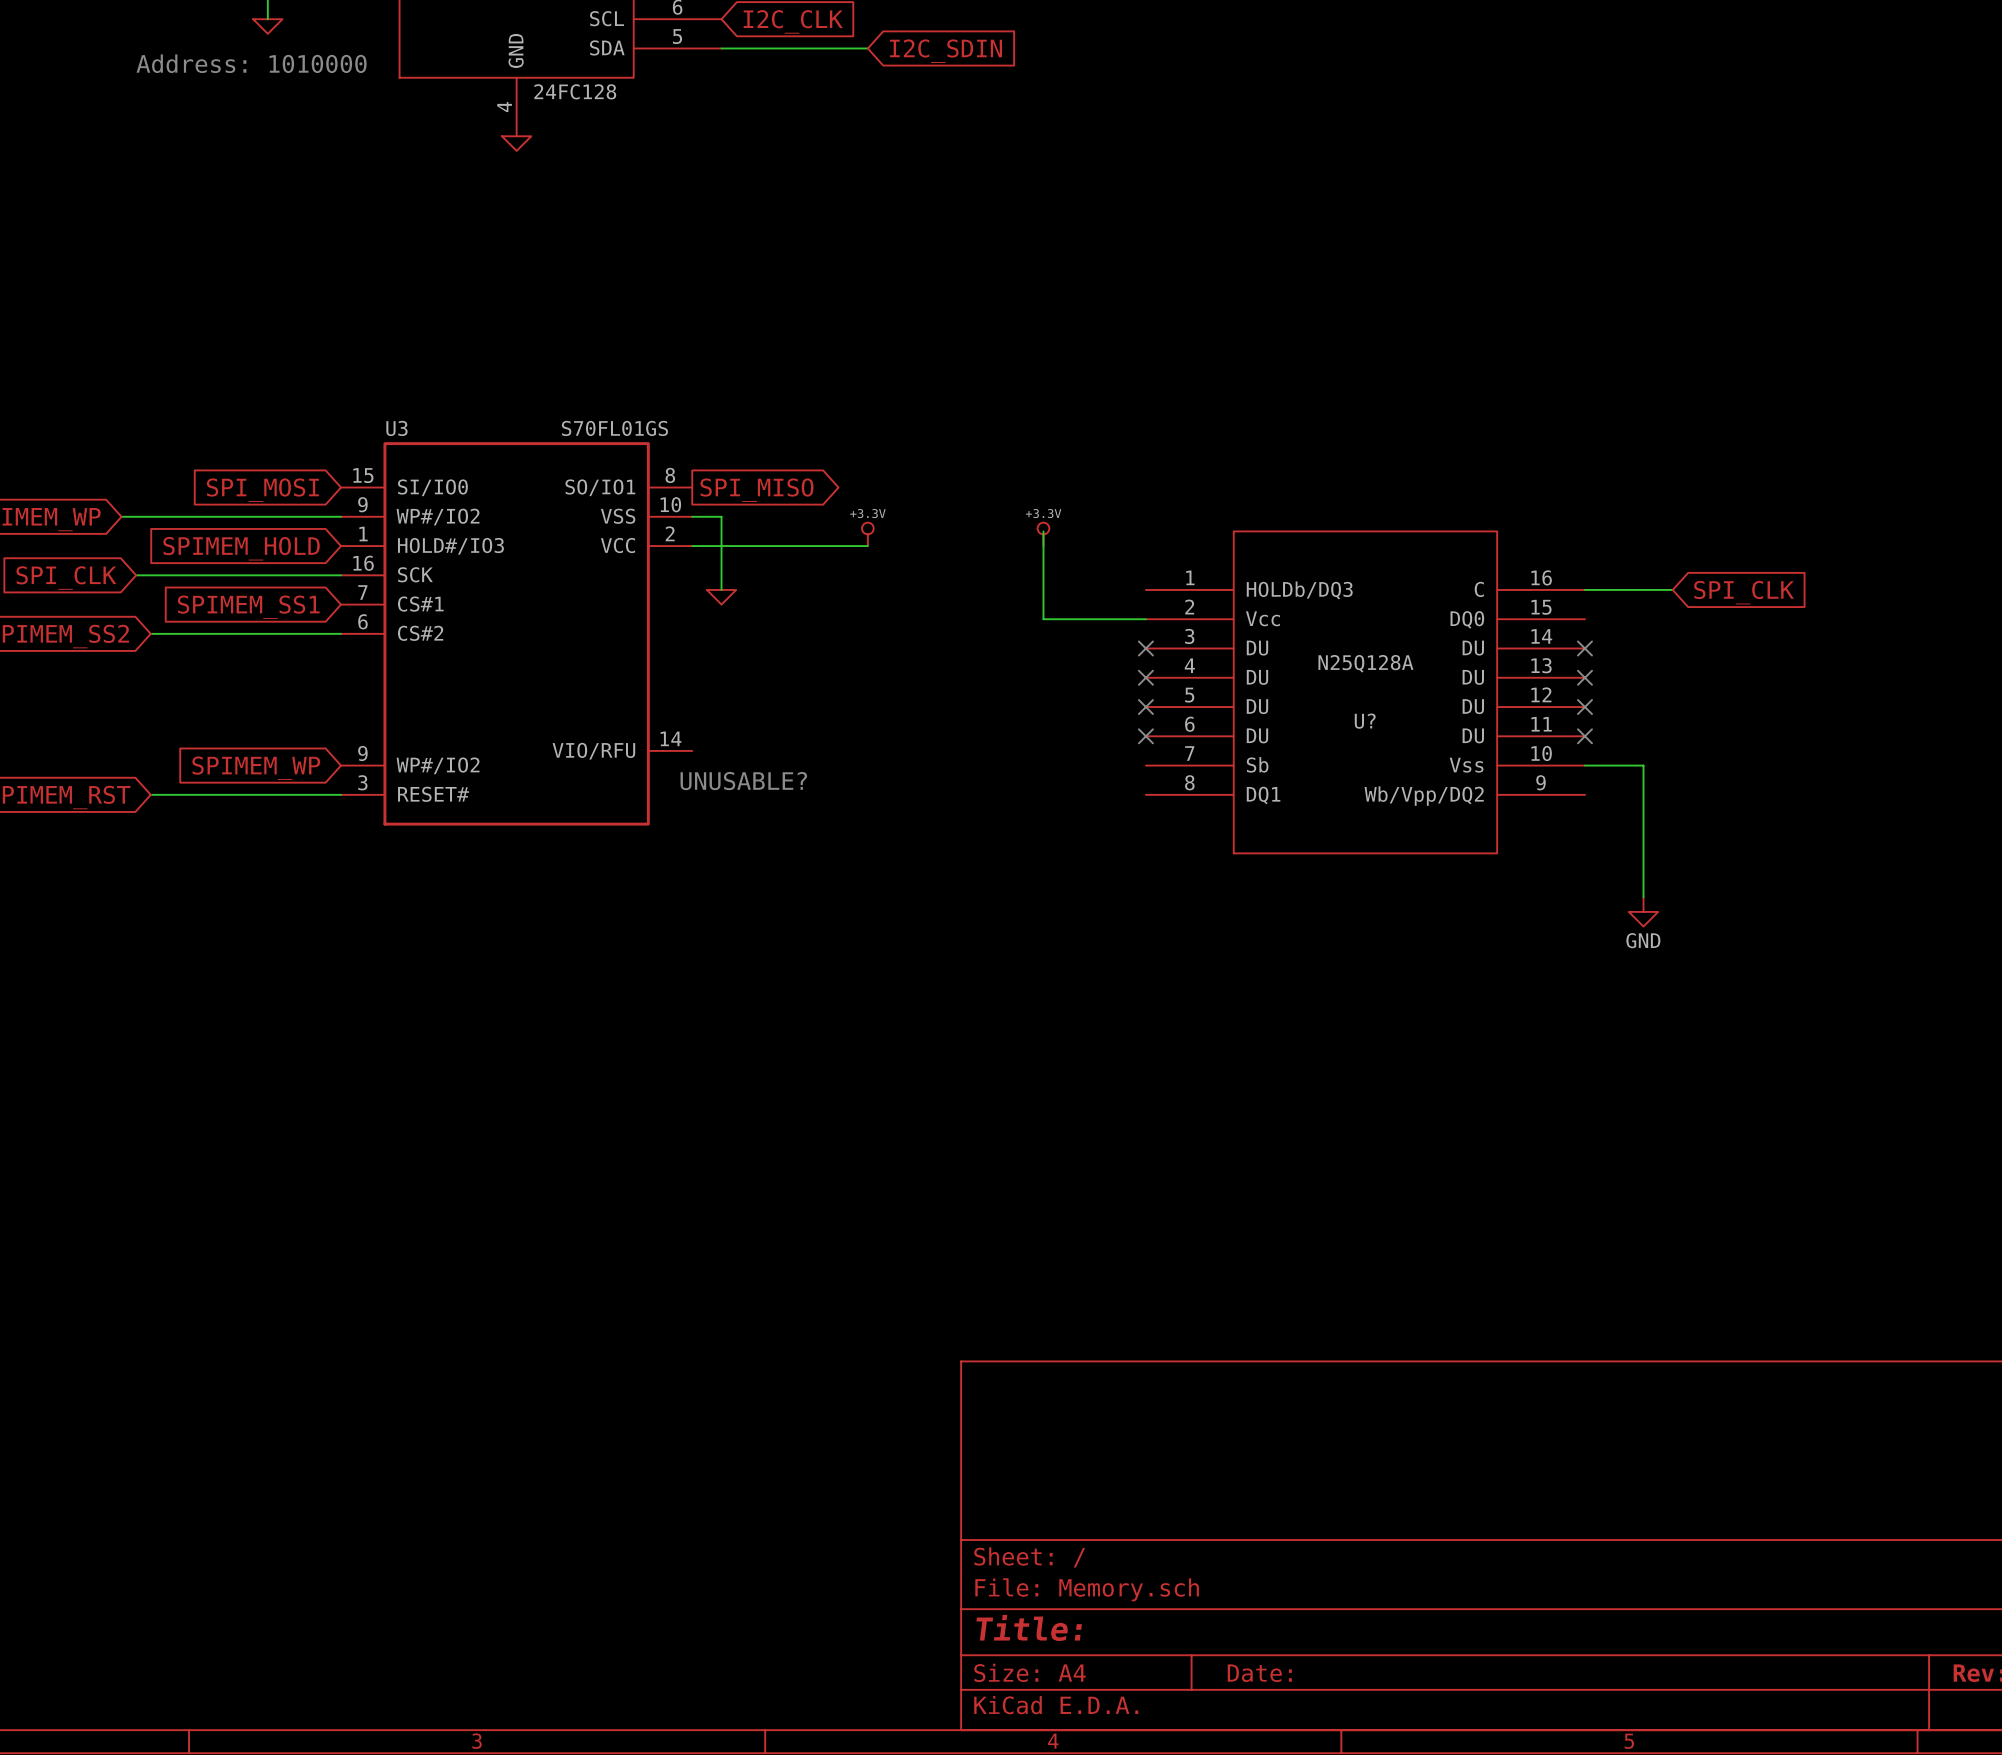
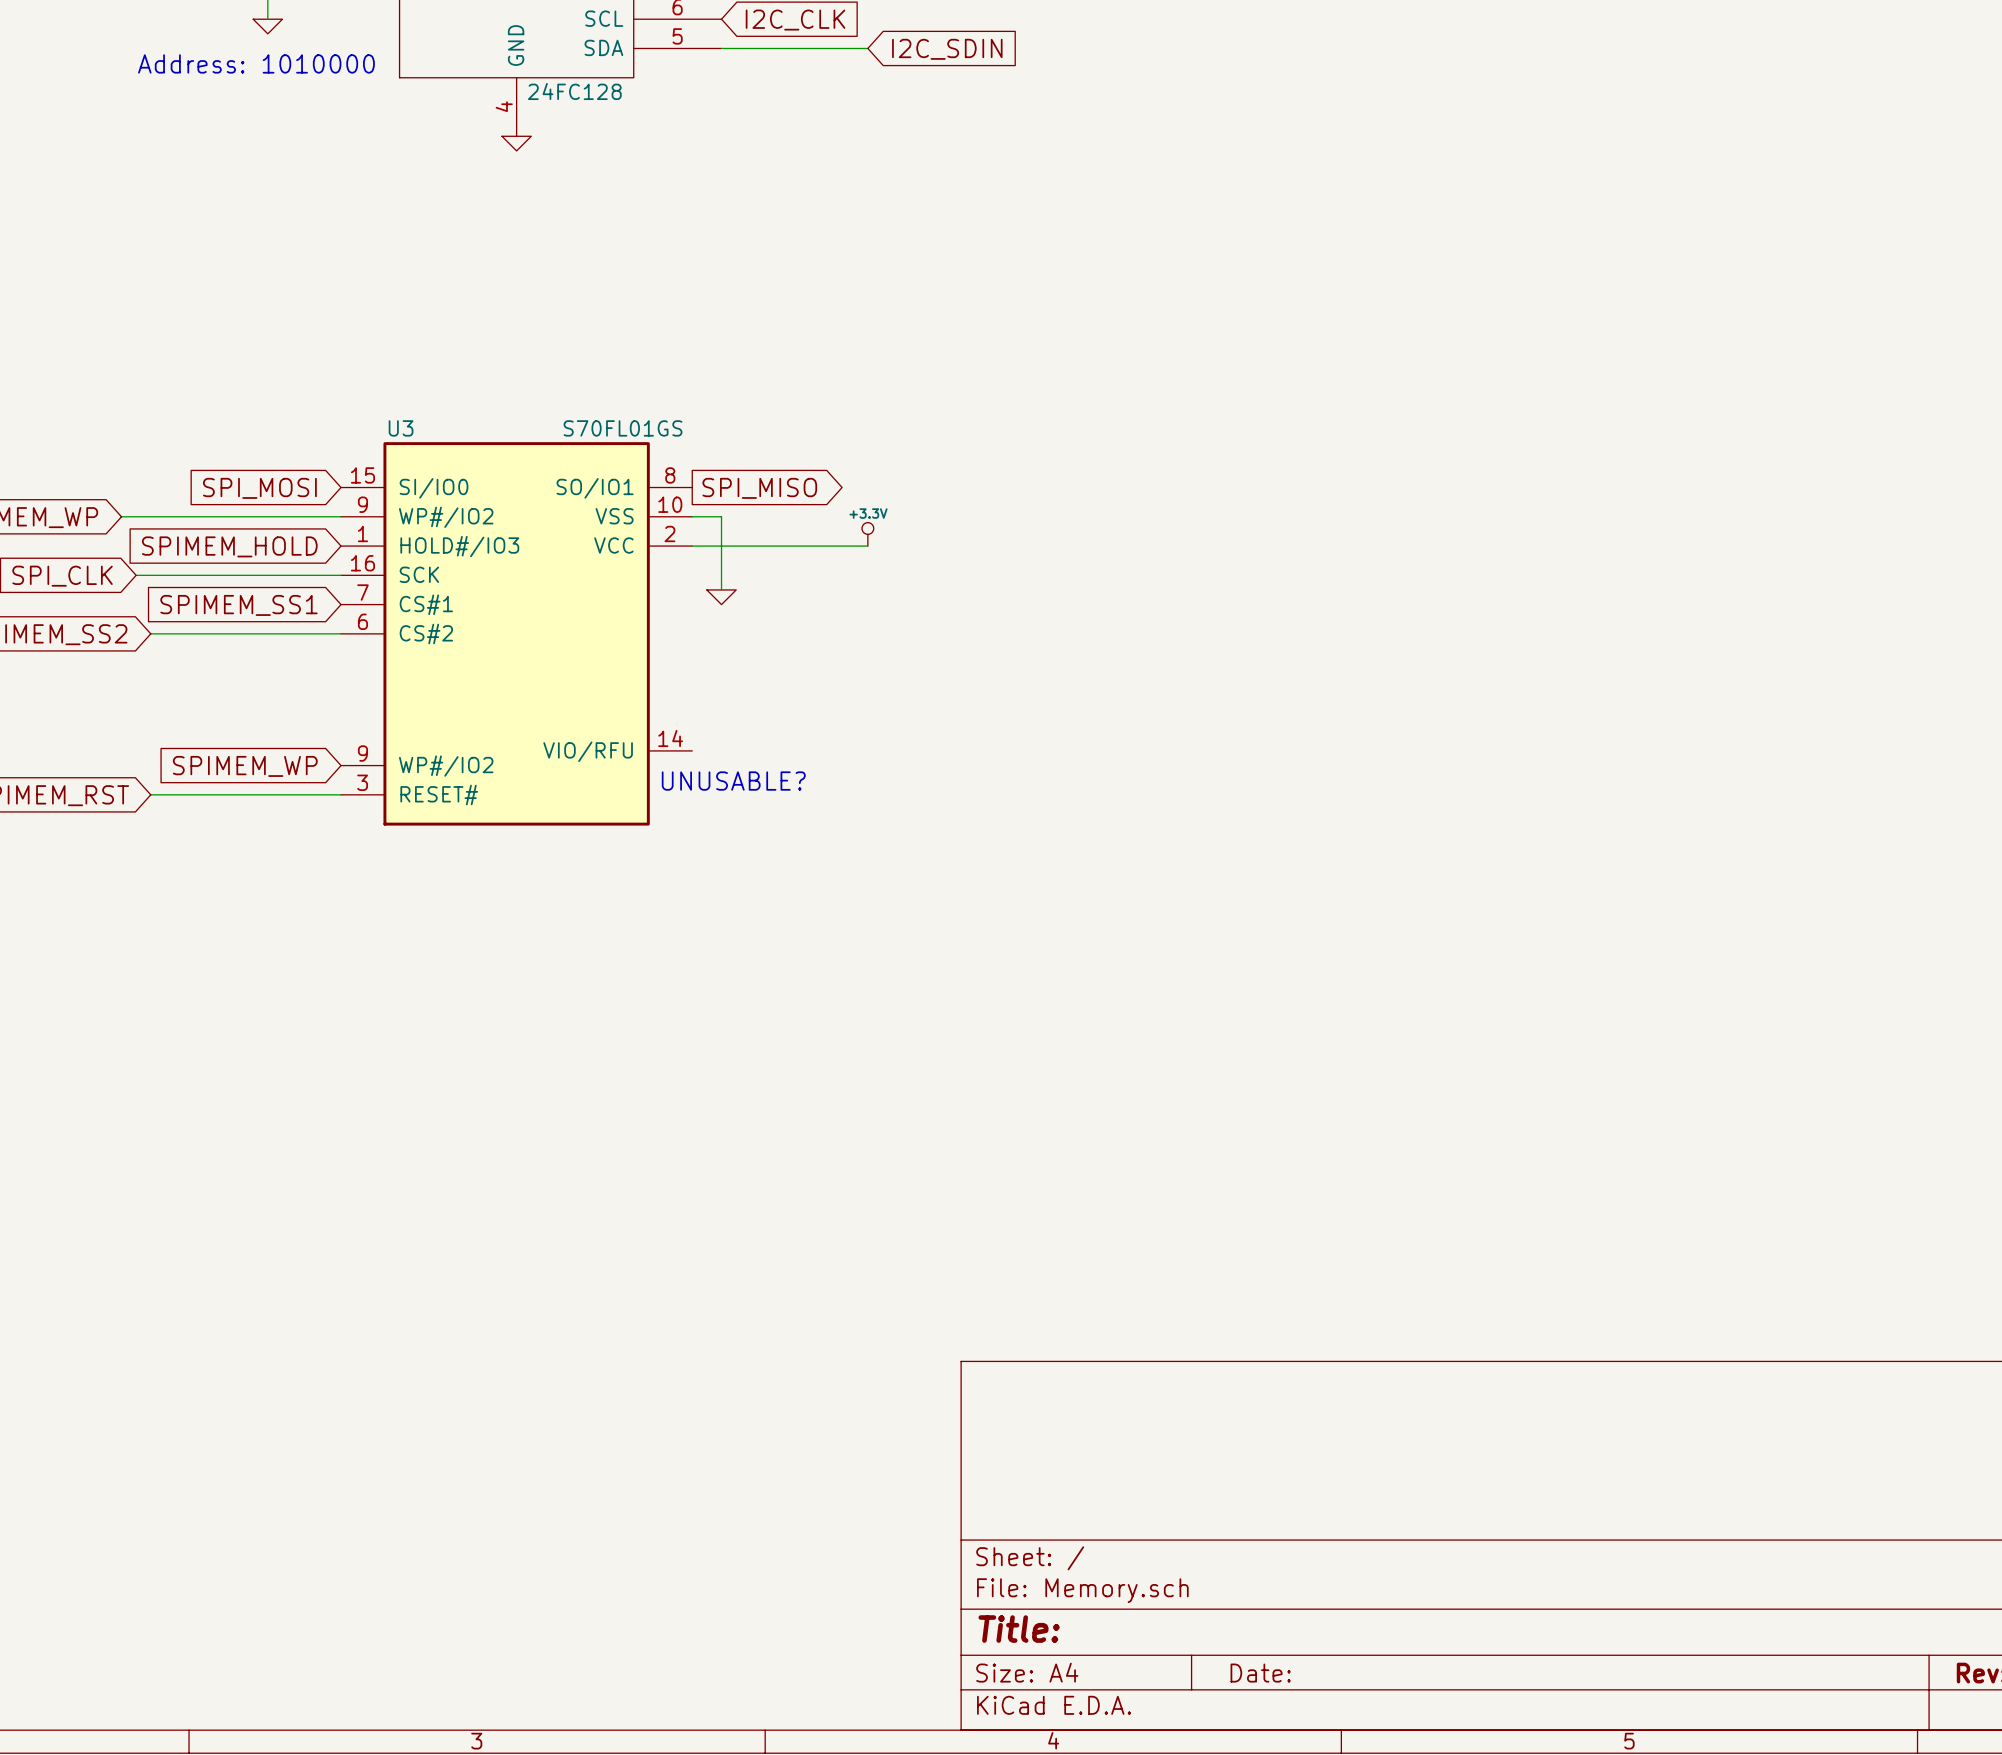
wire: (1043, 531) (1043, 619) (1145, 619) -> none
power symbol: +3.3V (1043, 534) -> none
wire: (1584, 589) (1672, 589) -> none
global label: SPI_CLK (1744, 592) -> none
no-connect mark: (1145, 648) -> none
no-connect mark: (1584, 648) -> none
no-connect mark: (1145, 677) -> none
no-connect mark: (1584, 677) -> none
U?: N25Q128A (1365, 692) -> none
no-connect mark: (1145, 707) -> none
no-connect mark: (1584, 707) -> none
no-connect mark: (1145, 736) -> none
no-connect mark: (1584, 736) -> none
wire: (1584, 765) (1643, 765) (1643, 897) -> none
power symbol: GND (1643, 911) -> none

